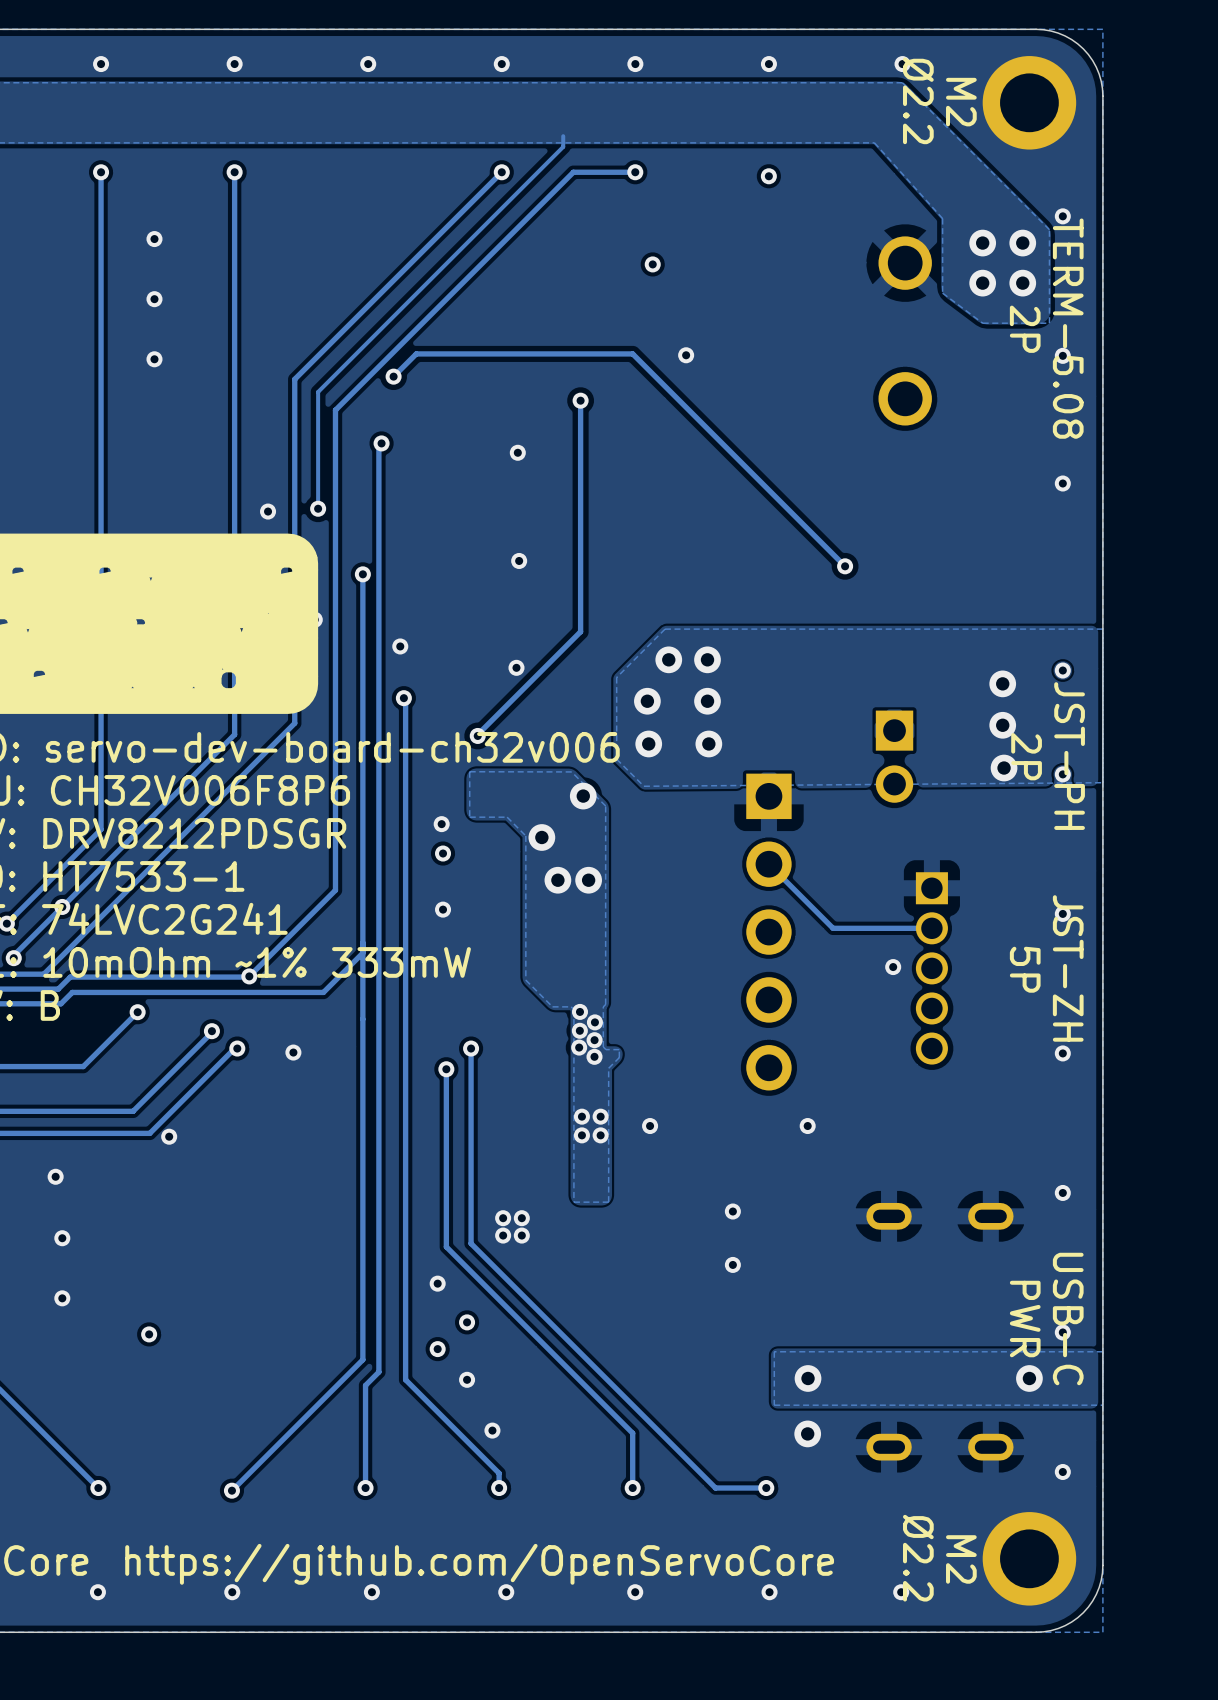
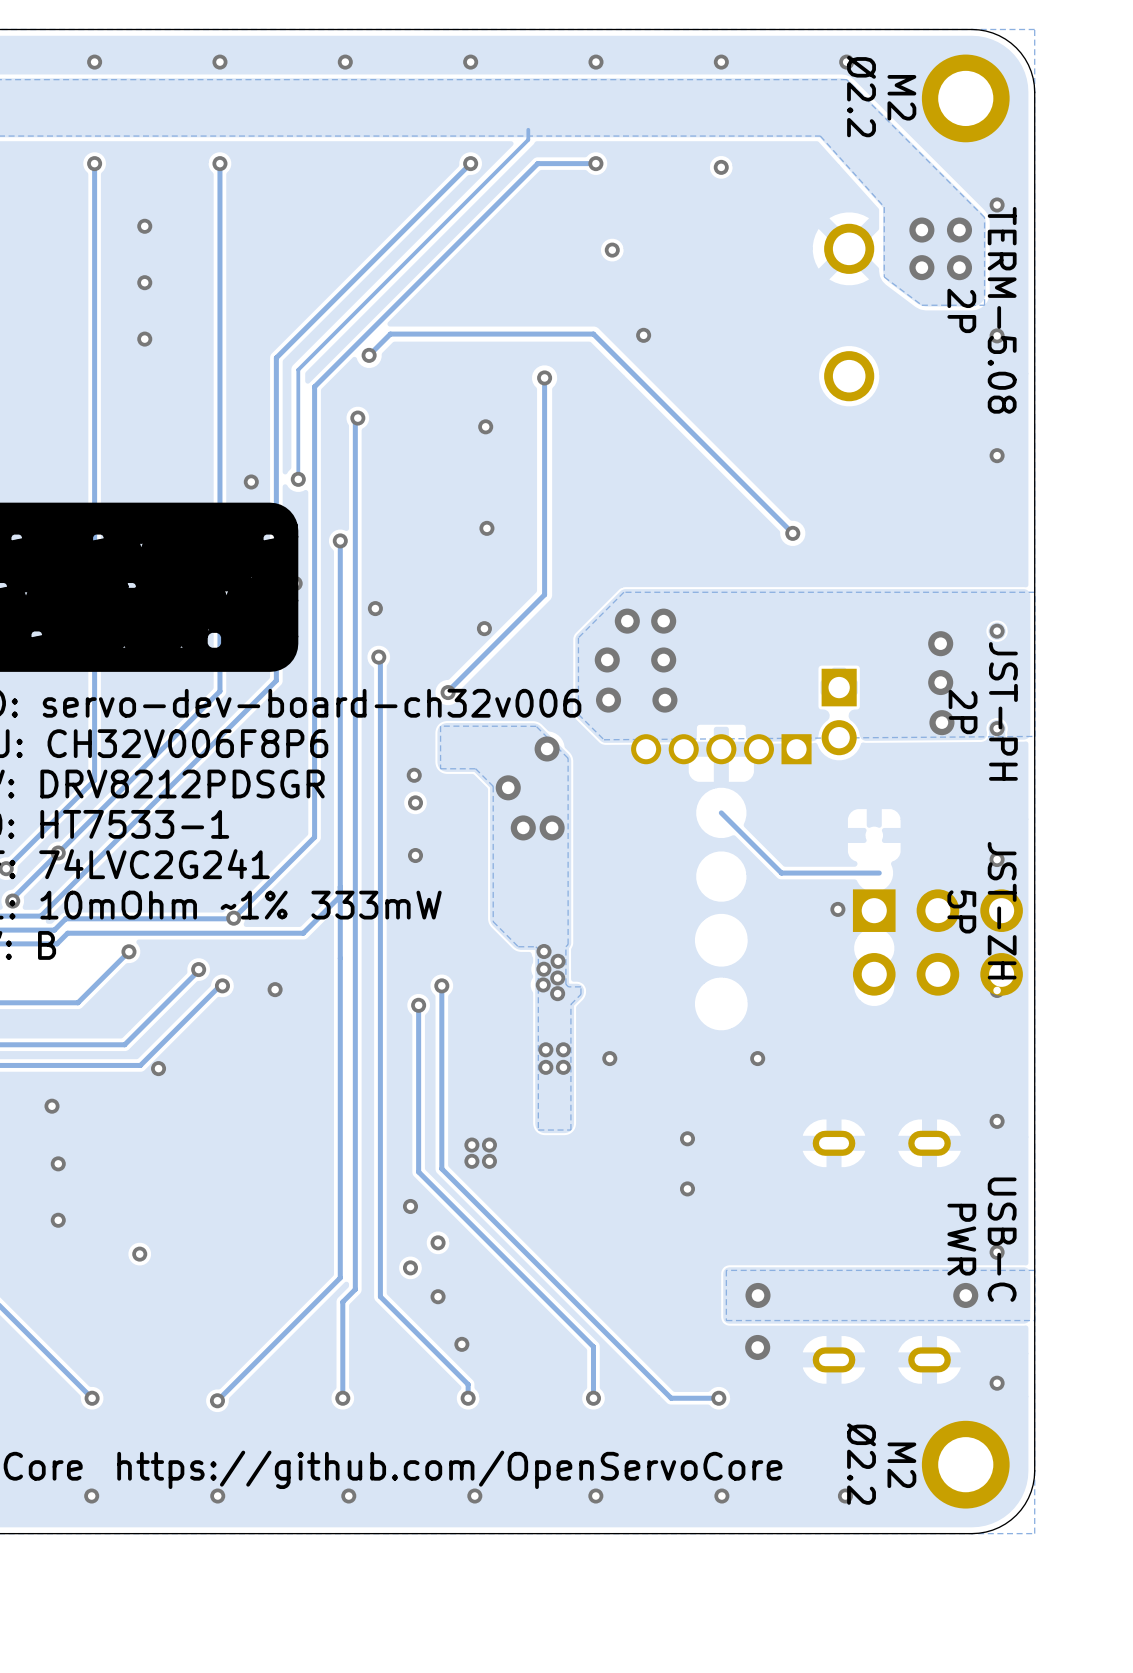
part: (768, 932) -> none
part rotation: 0° (931, 968) -> 90° clockwise (721, 749)
part position: (931, 968) -> (721, 749)
part: none -> (937, 942)

